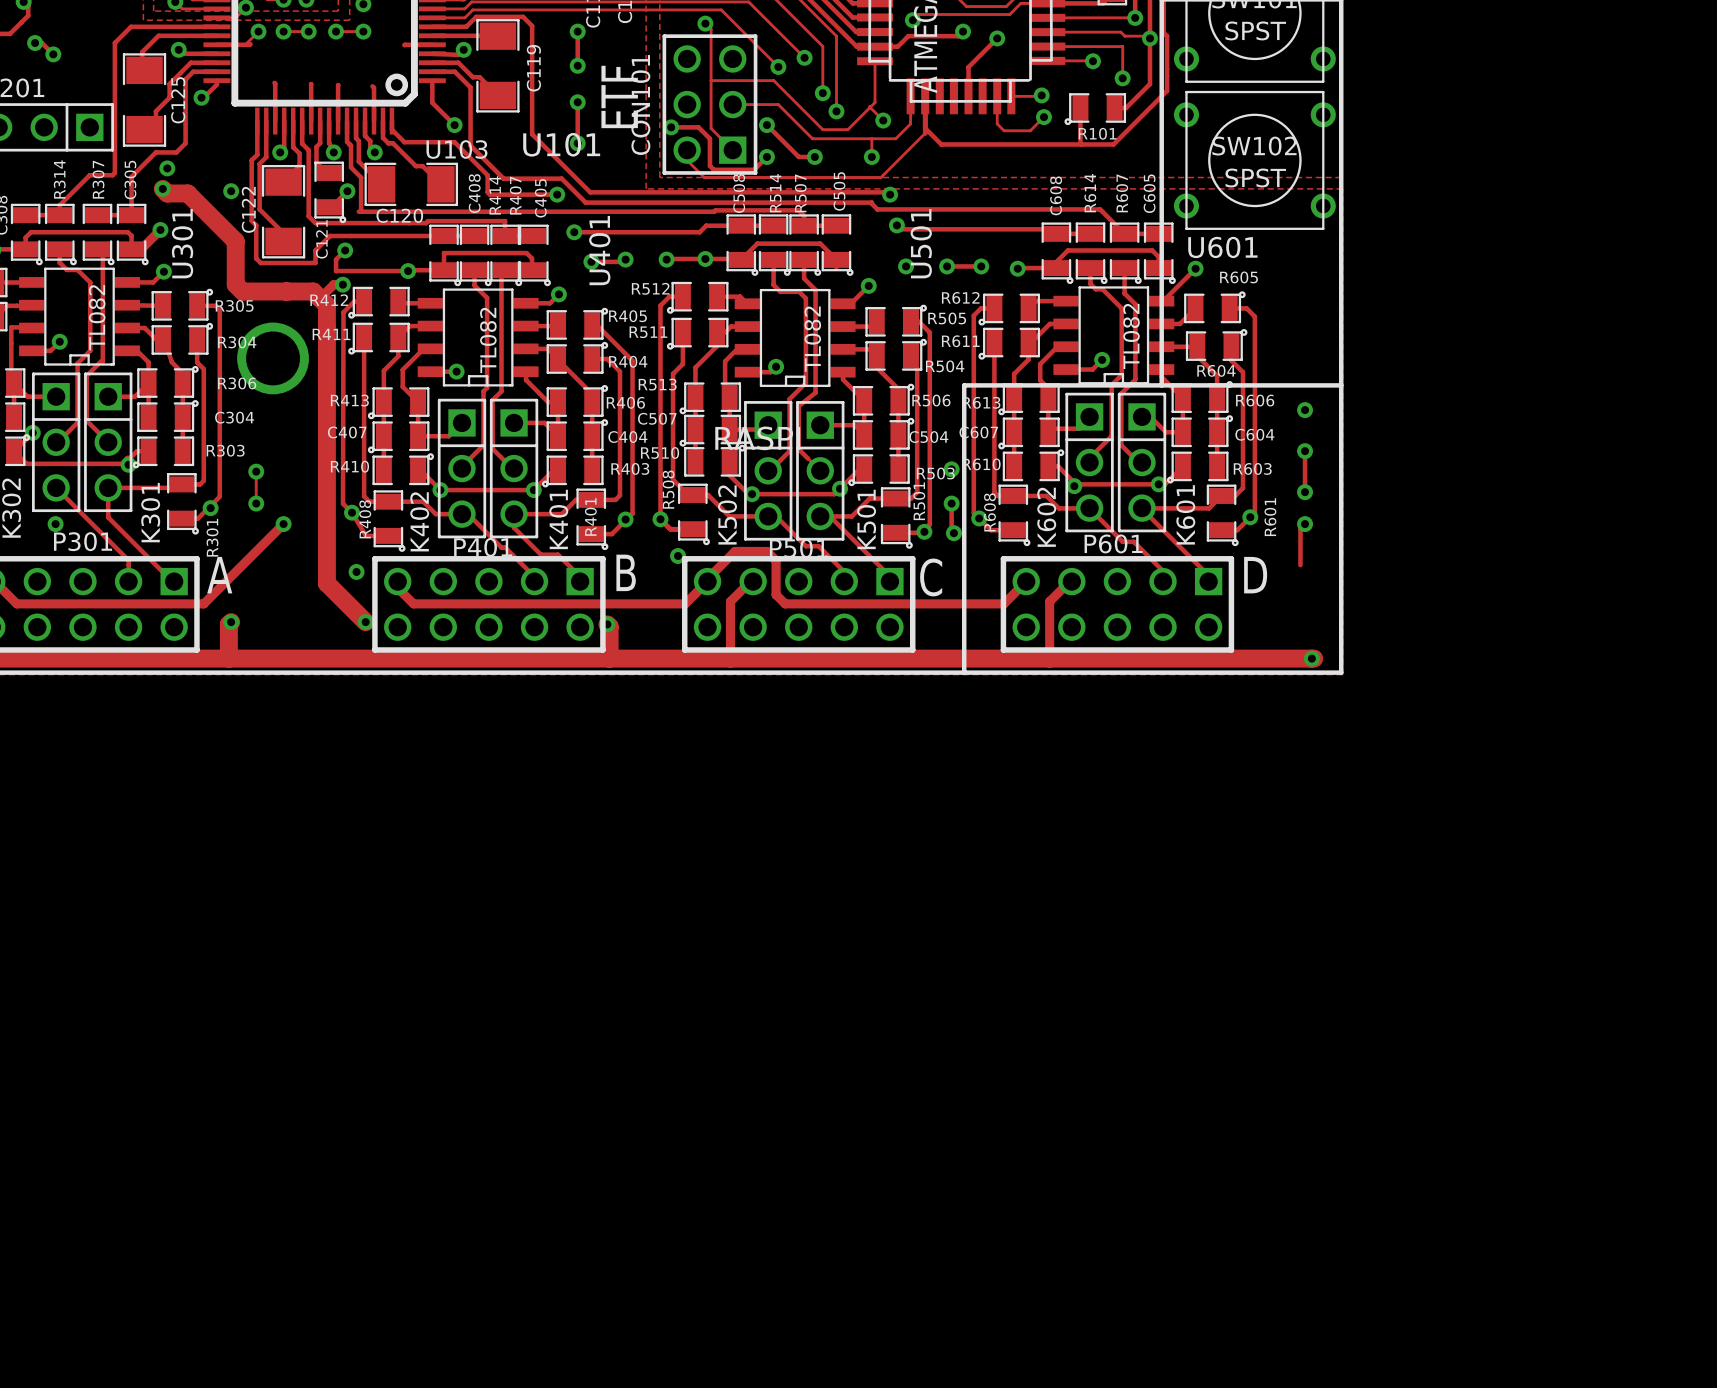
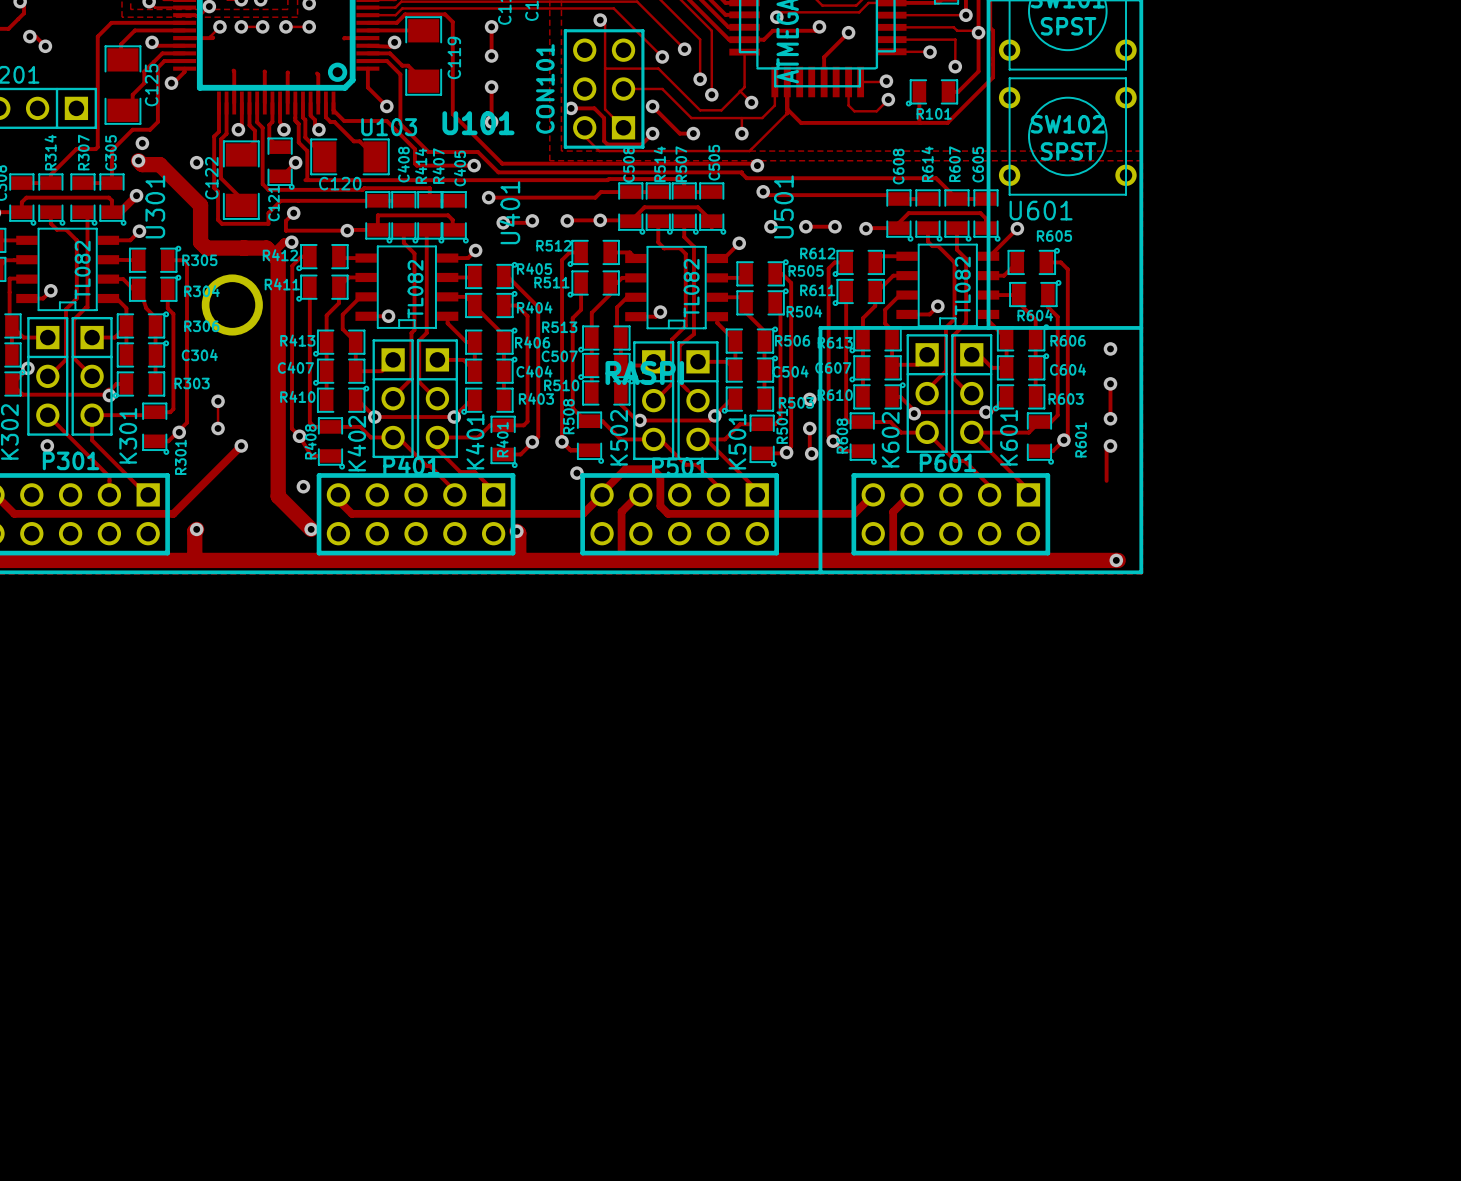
text: ETF (619, 96) -> none
text: B (626, 572) -> none
text: A (219, 575) -> none
text: D (1255, 575) -> none
text: C (931, 577) -> none

